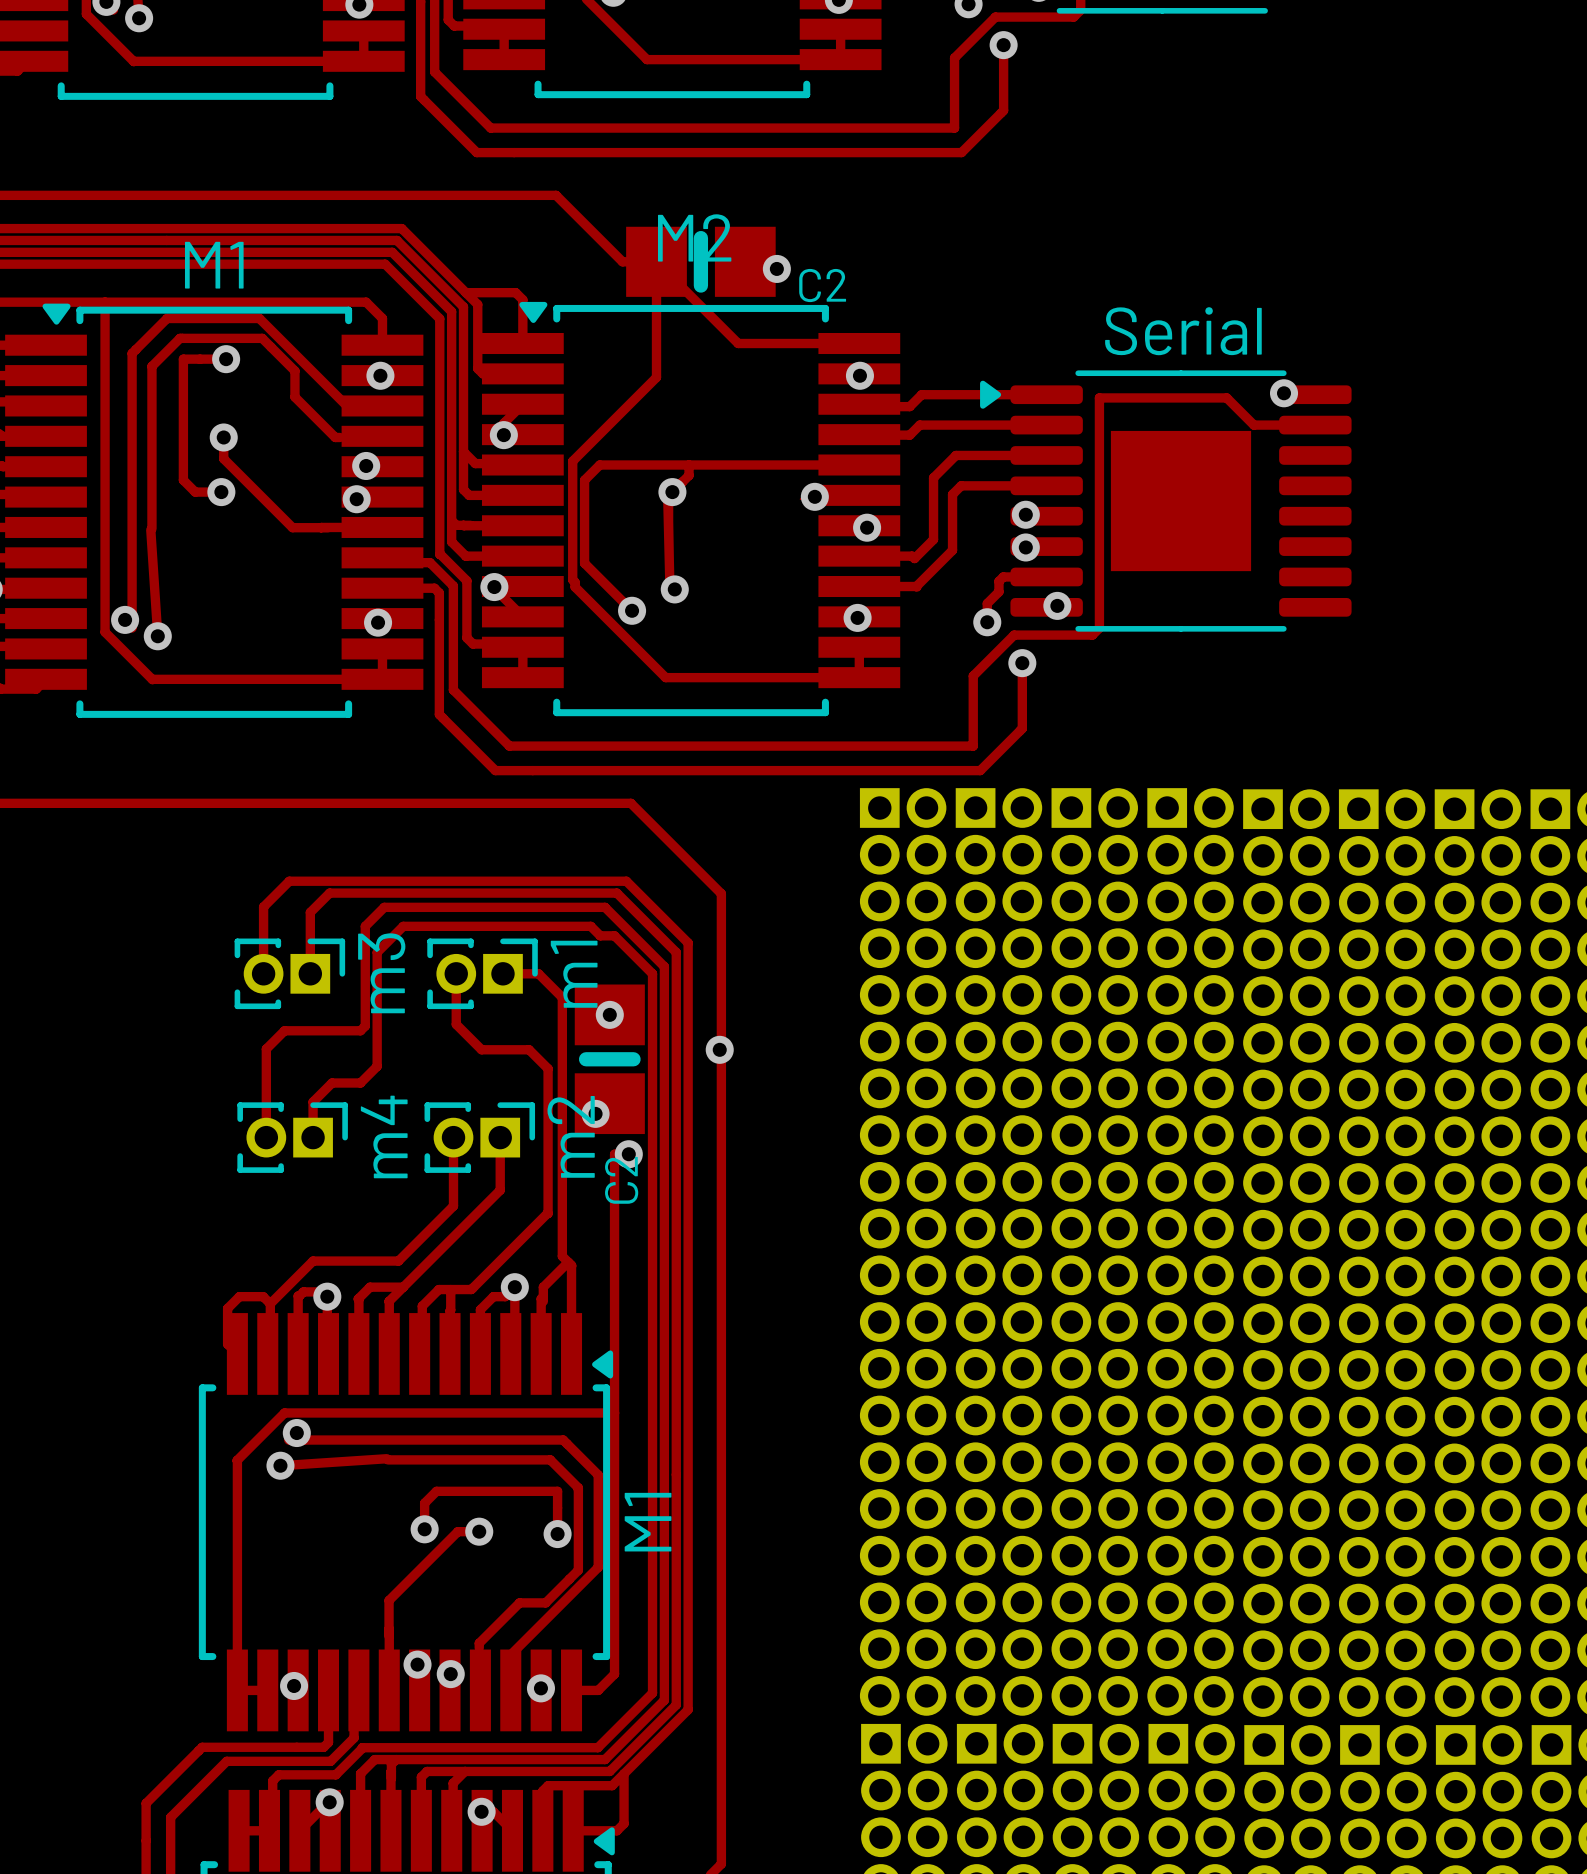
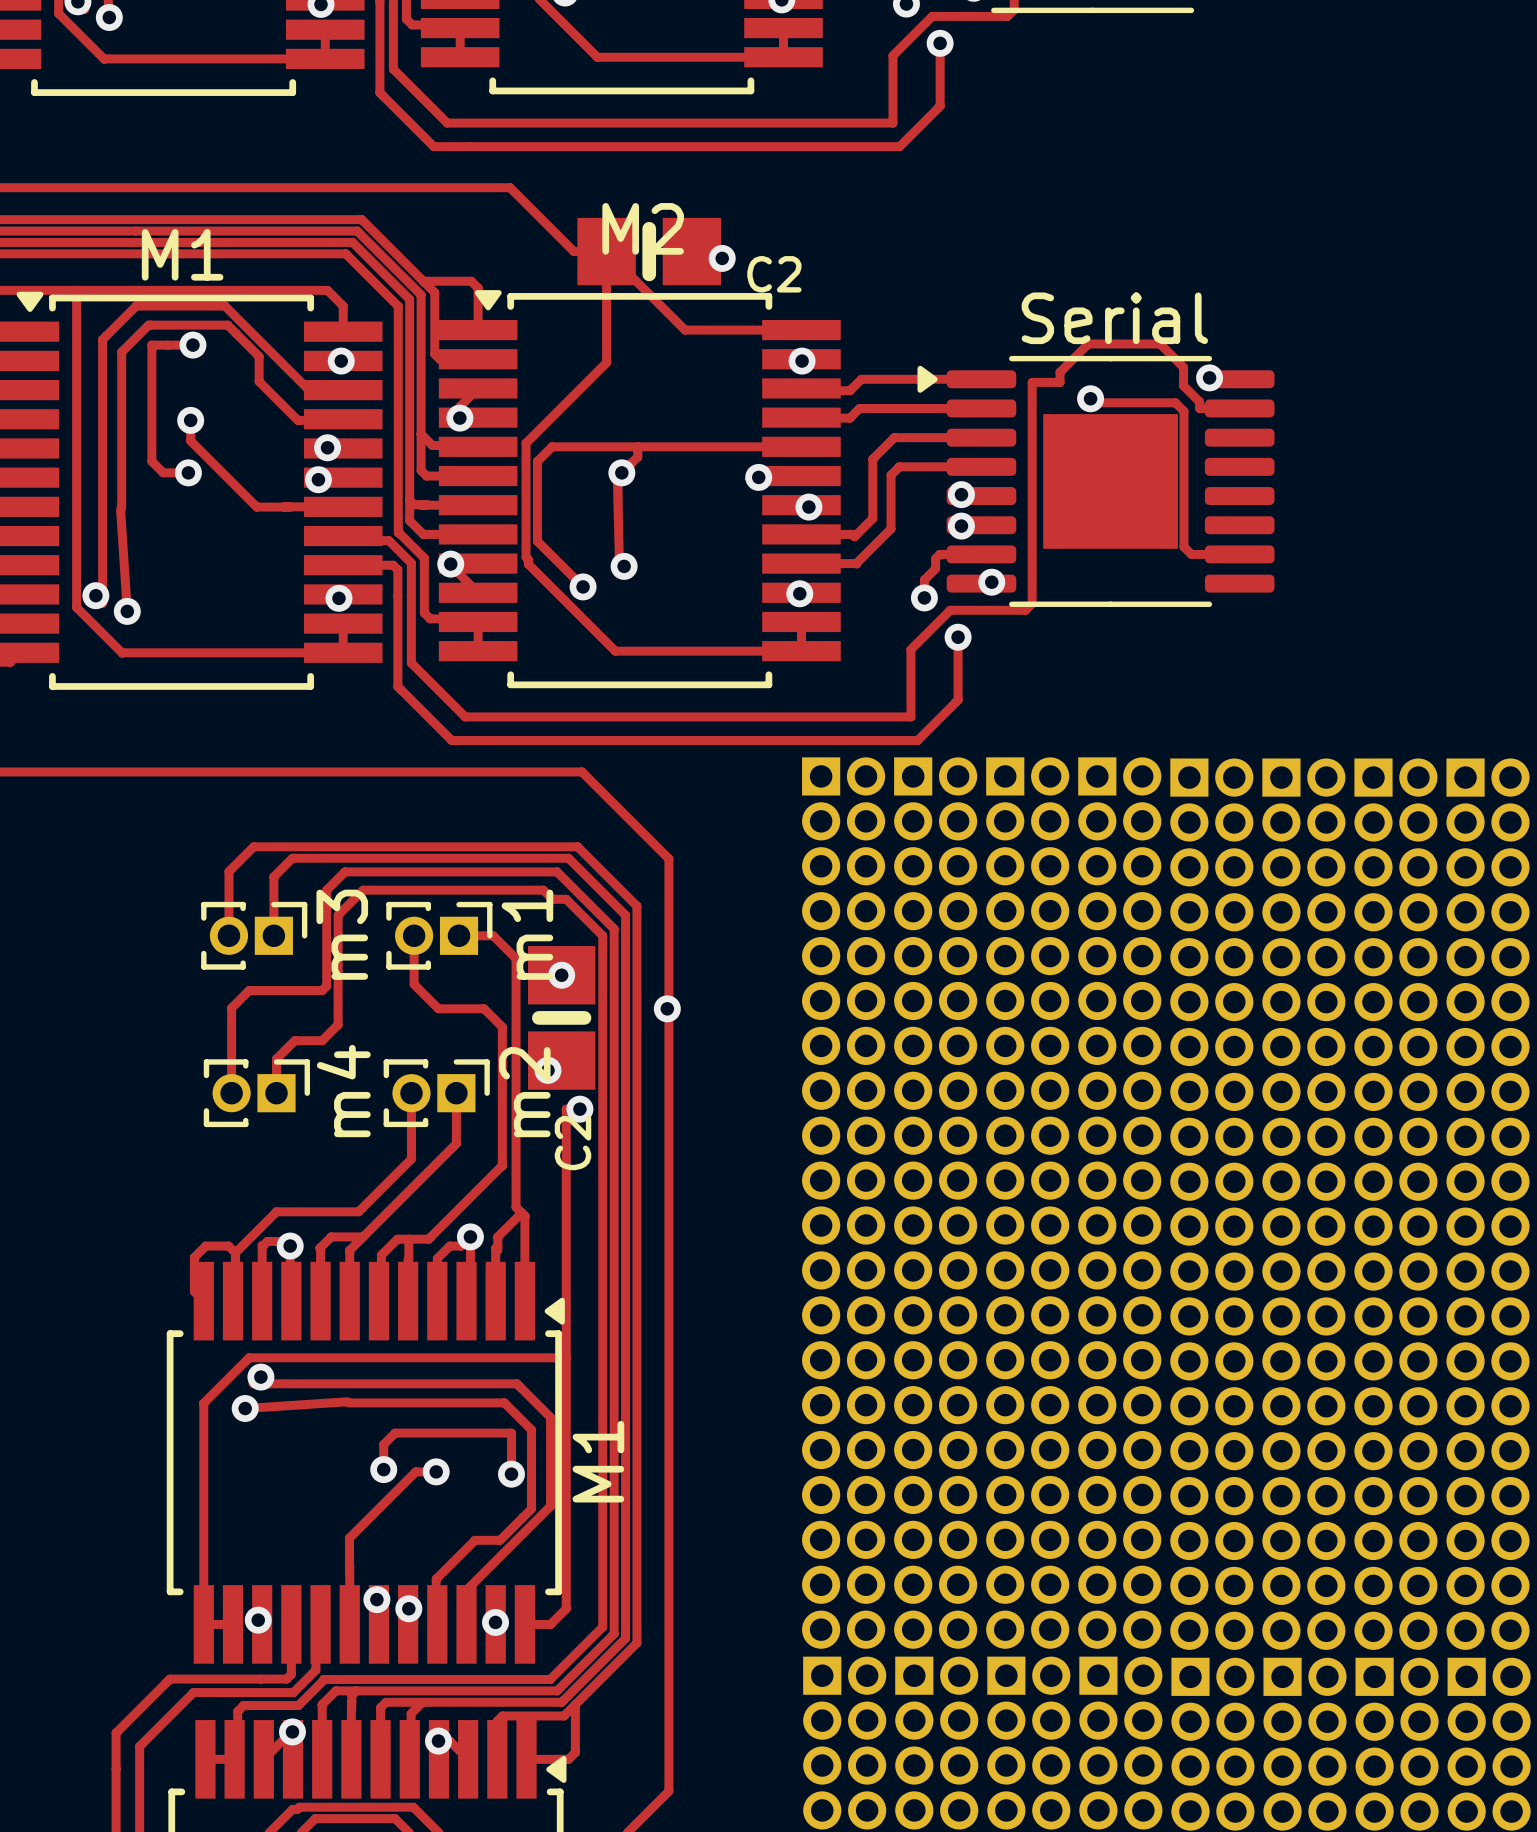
track: (1128, 397) (1226, 397) (1253, 425) (1273, 425) -> (1060, 382) (1060, 372) (1088, 343) (1160, 343) (1183, 367) (1183, 385) (1199, 401) (1199, 408)
via: none -> (1090, 398)
track: none -> (1091, 402) (1175, 402) (1183, 411) (1183, 546) (1191, 554) (1239, 554)

